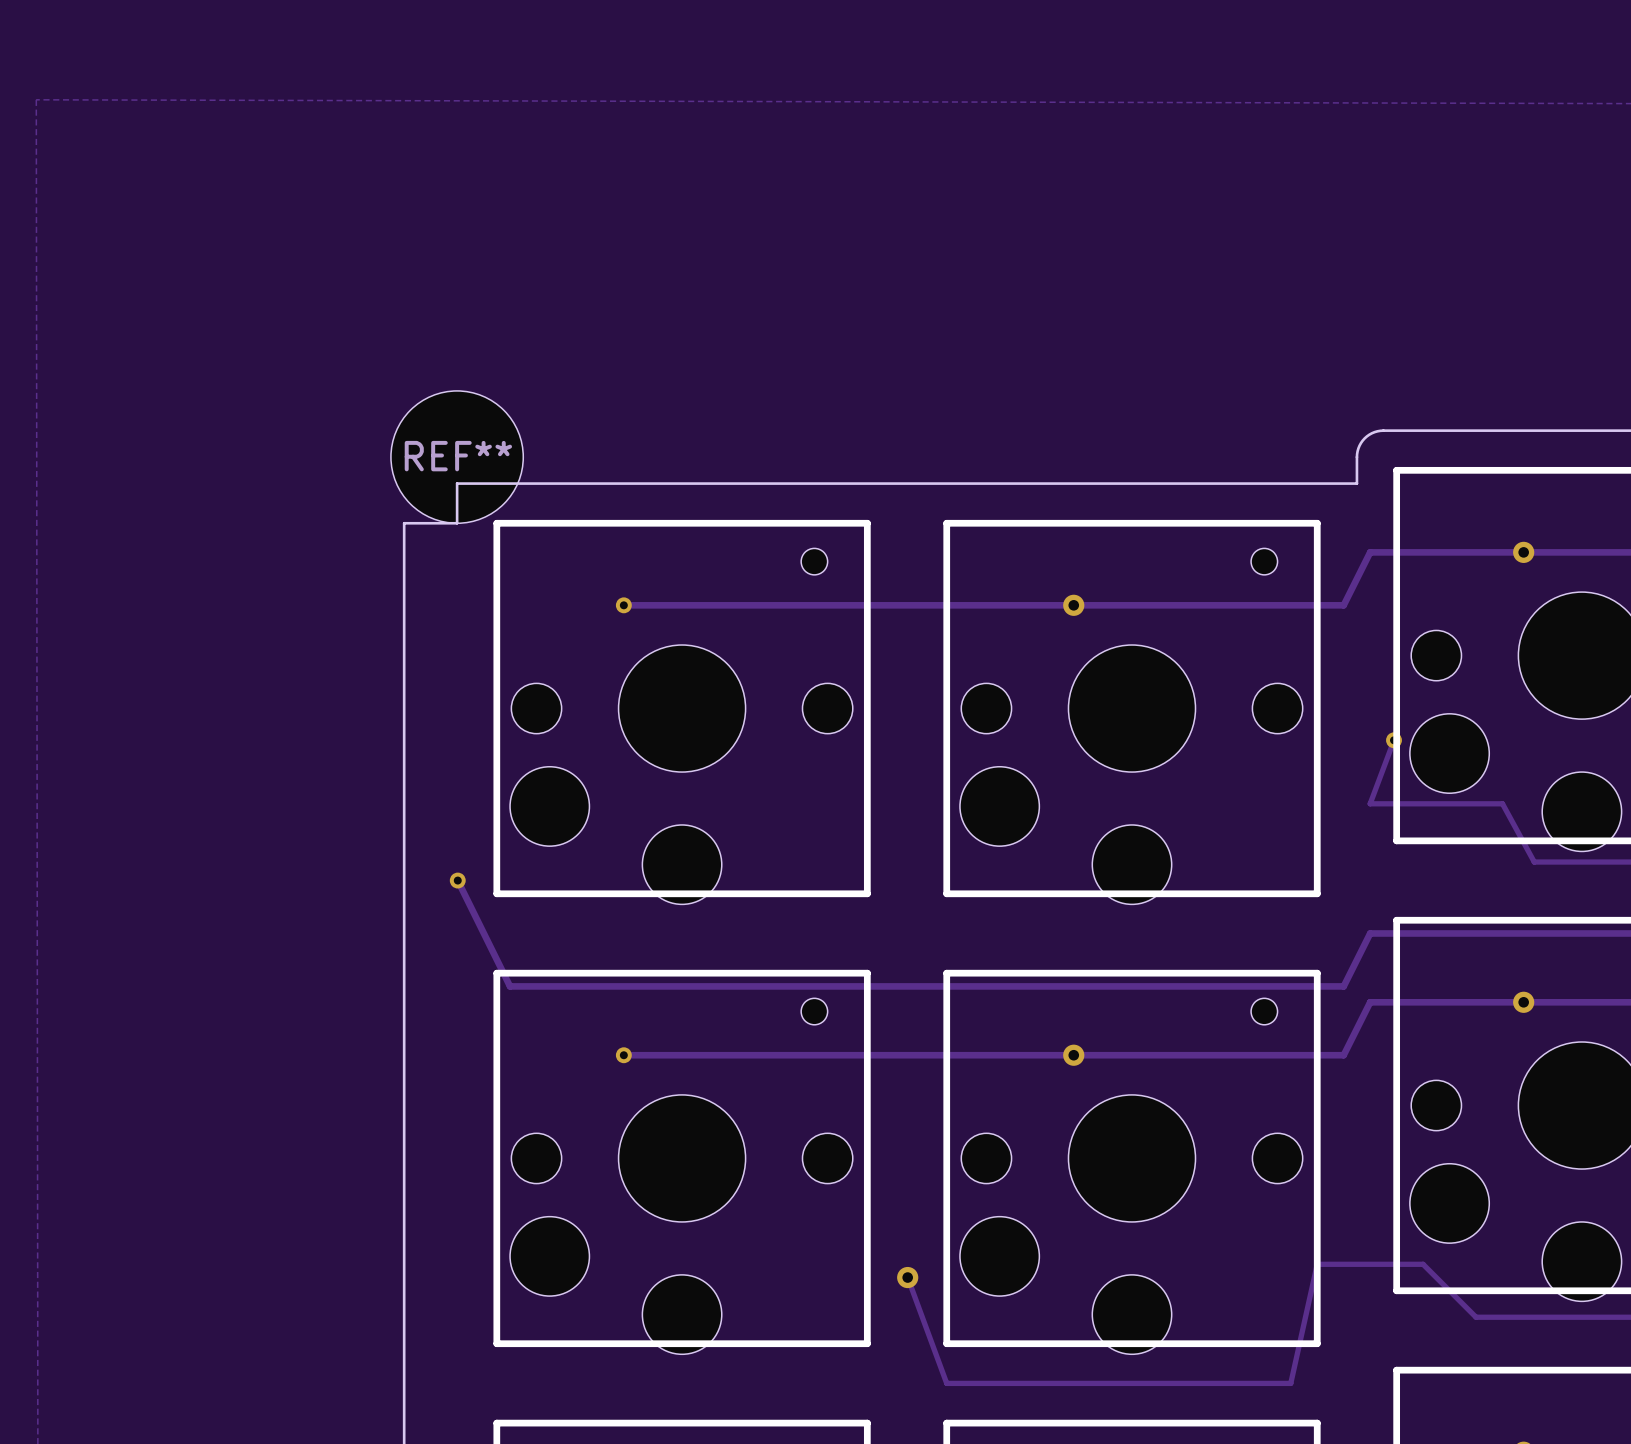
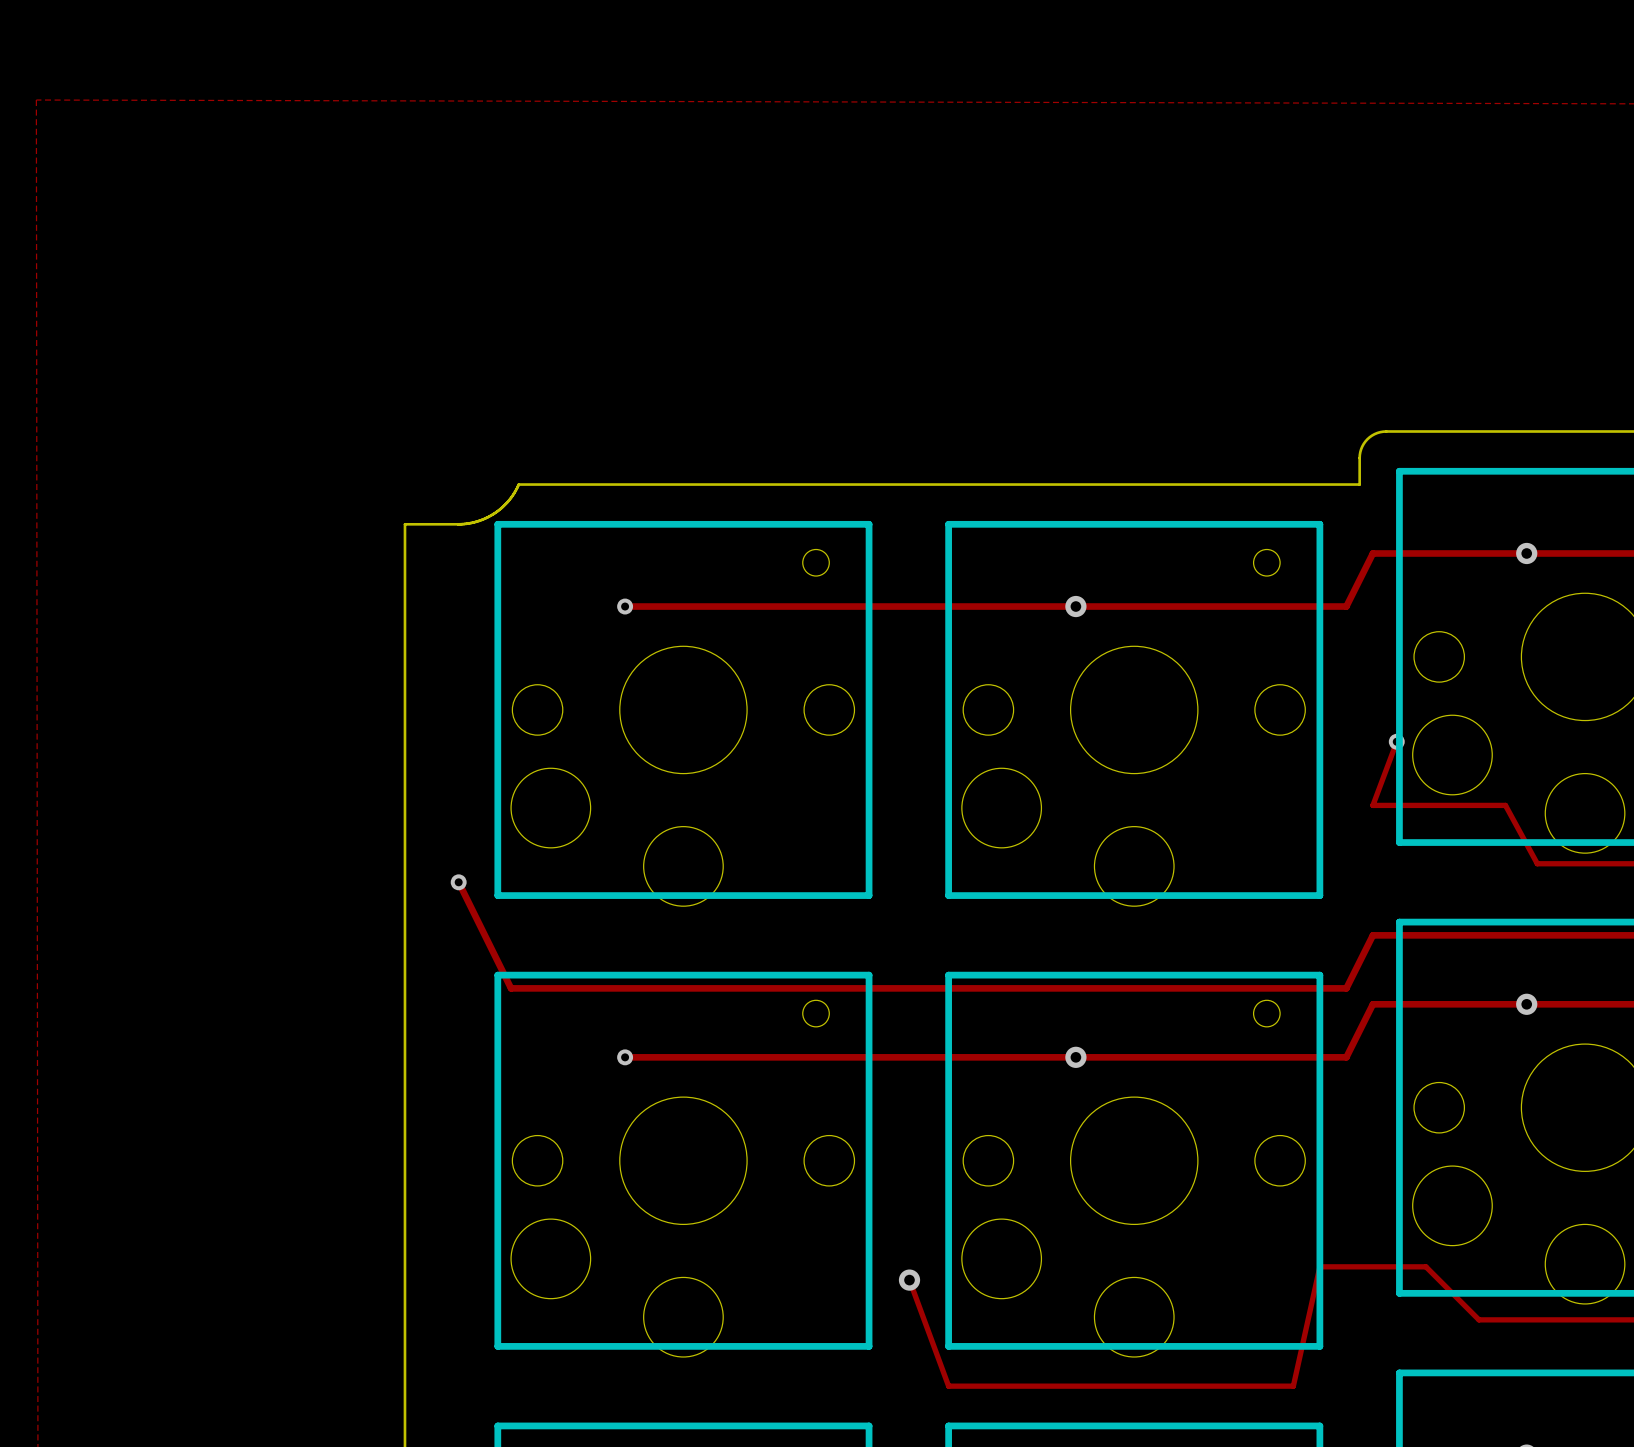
REF**: (457, 457) -> none
board edge: (517, 483) (457, 483) (457, 523) -> (518, 484) (508, 501) (494, 513) (477, 521) (458, 524)

